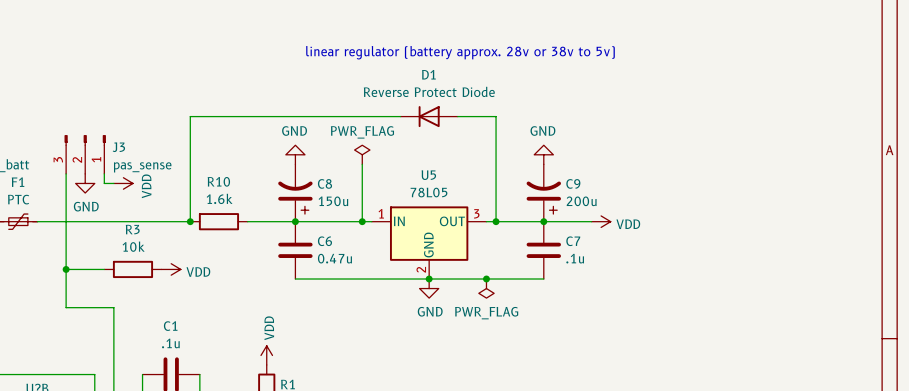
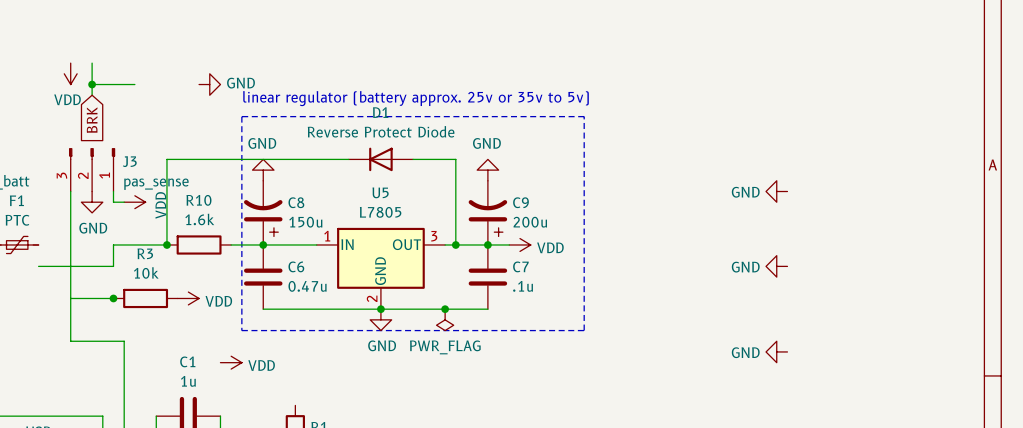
text: linear regulator (battery approx. 28v or 38v to 5v) (460, 52) -> none
wire: none -> (92, 63) (92, 95)
power symbol: none -> VDD (70, 73)
wire: none -> (92, 84) (134, 84)
junction: none -> (92, 84)
power symbol: none -> GND (209, 84)
text: none -> linear regulator (battery approx. 25v or 35v to 5v) (415, 98)
line: none -> (241, 116) (241, 330) (584, 330) (584, 116) (241, 116)
global label: none -> BRK (92, 120)
wire: (400, 116) (190, 116) (190, 221) (152, 221) -> (348, 159) (166, 159) (166, 244)
D1 position: (429, 116) -> (380, 159)
wire: (457, 116) (496, 116) (496, 221) -> none
wire: none -> (413, 159) (455, 159) (455, 244)
power symbol position: GND (295, 154) -> GND (263, 170)
power symbol: PWR_FLAG (362, 154) -> none
power symbol: none -> GND (487, 170)
power symbol: GND (543, 154) -> none
wire: (362, 164) (362, 221) -> none
power symbol: none -> GND (776, 191)
U5 value: 78L05 (428, 192) -> L7805 (380, 212)
C8 position: (295, 193) -> (263, 212)
C9 position: (543, 193) -> (487, 212)
wire: (37, 221) (104, 221) -> (38, 266) (113, 266) (113, 244)
junction: none -> (166, 244)
junction: (190, 221) -> none
wire: none -> (231, 244) (273, 244)
R10 position: (218, 221) -> (199, 244)
junction: none -> (263, 244)
junction: (295, 221) -> none
junction: (362, 221) -> none
junction: none -> (455, 244)
junction: none -> (487, 244)
power symbol: none -> VDD (520, 244)
wire: (486, 221) (591, 221) -> none
junction: (496, 221) -> none
junction: (543, 221) -> none
power symbol: VDD (601, 221) -> none
power symbol: none -> GND (776, 266)
U5 position: (429, 242) -> (380, 268)
C6 position: (295, 250) -> (263, 277)
C7 position: (543, 250) -> (487, 277)
junction position: (66, 269) -> (113, 298)
wire: none -> (263, 309) (327, 309)
junction: none -> (380, 309)
junction position: (429, 279) -> (445, 309)
wire: (438, 279) (543, 279) -> none
junction: (486, 279) -> none
power symbol: none -> GND (380, 319)
power symbol: none -> PWR_FLAG (445, 319)
power symbol: GND (429, 288) -> none
power symbol: PWR_FLAG (486, 288) -> none
power symbol: none -> GND (776, 351)
power symbol: none -> VDD (231, 362)
C1 value: .1u (170, 343) -> 1u (188, 381)
power symbol: VDD (266, 355) -> none

